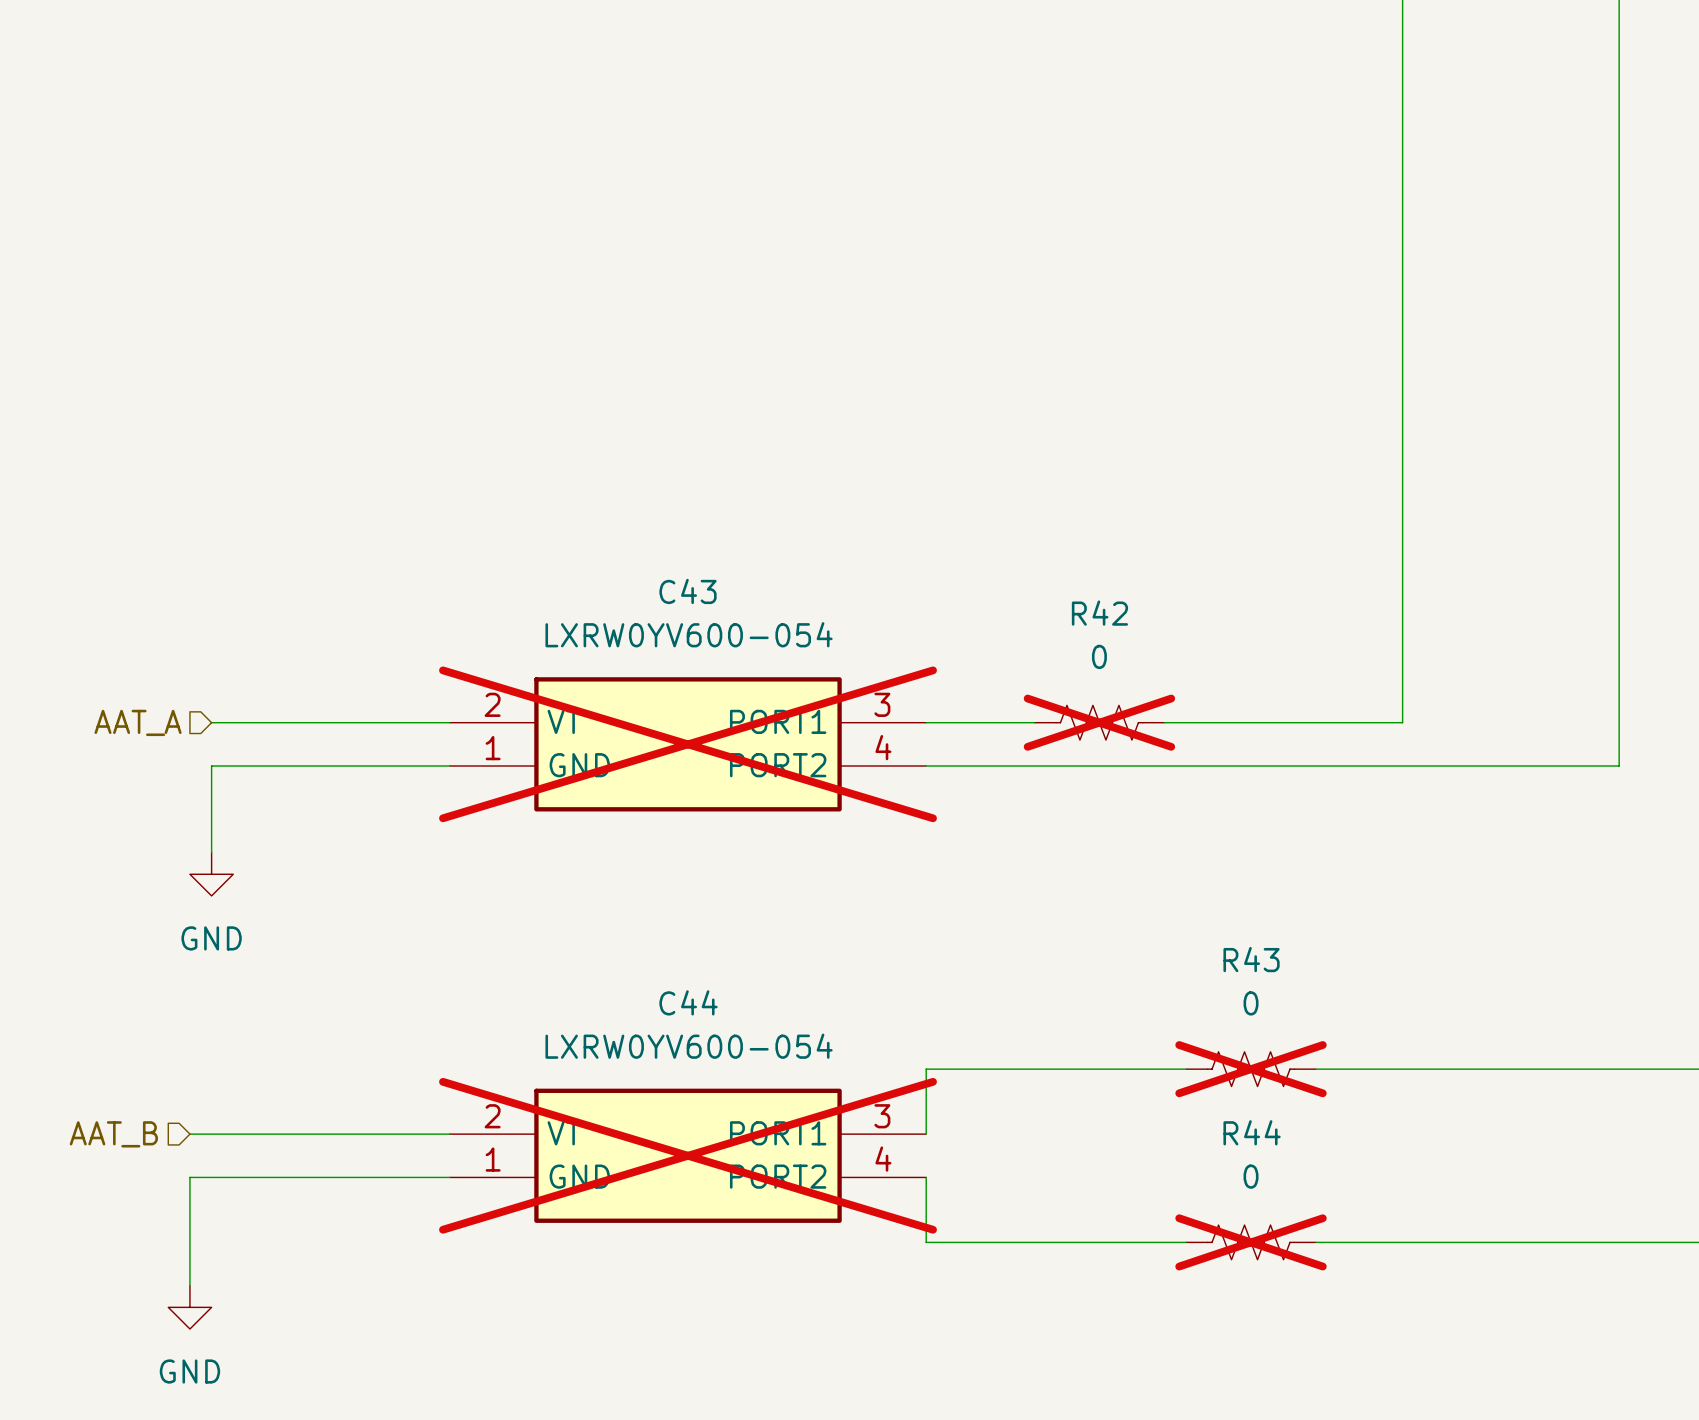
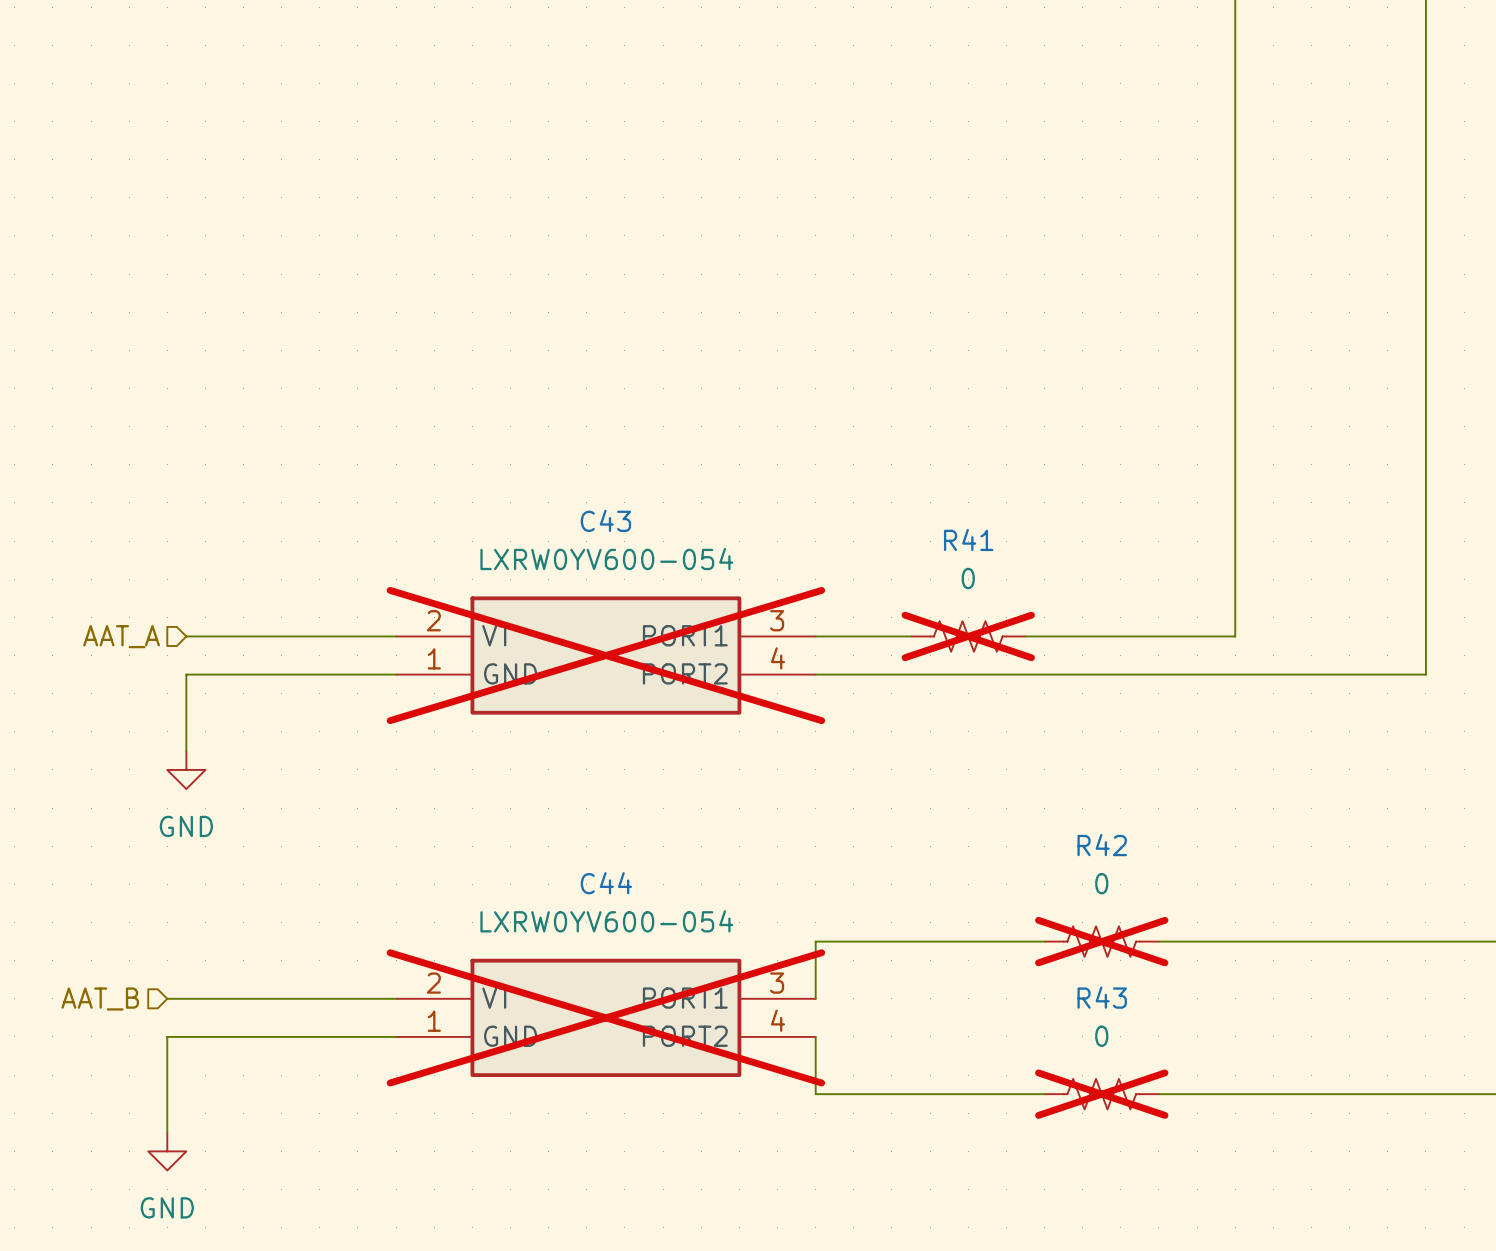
R42 name: R42 (1099, 613) -> R41 (968, 539)
R43 name: R43 (1251, 959) -> R42 (1102, 845)
R44 name: R44 (1252, 1132) -> R43 (1102, 997)

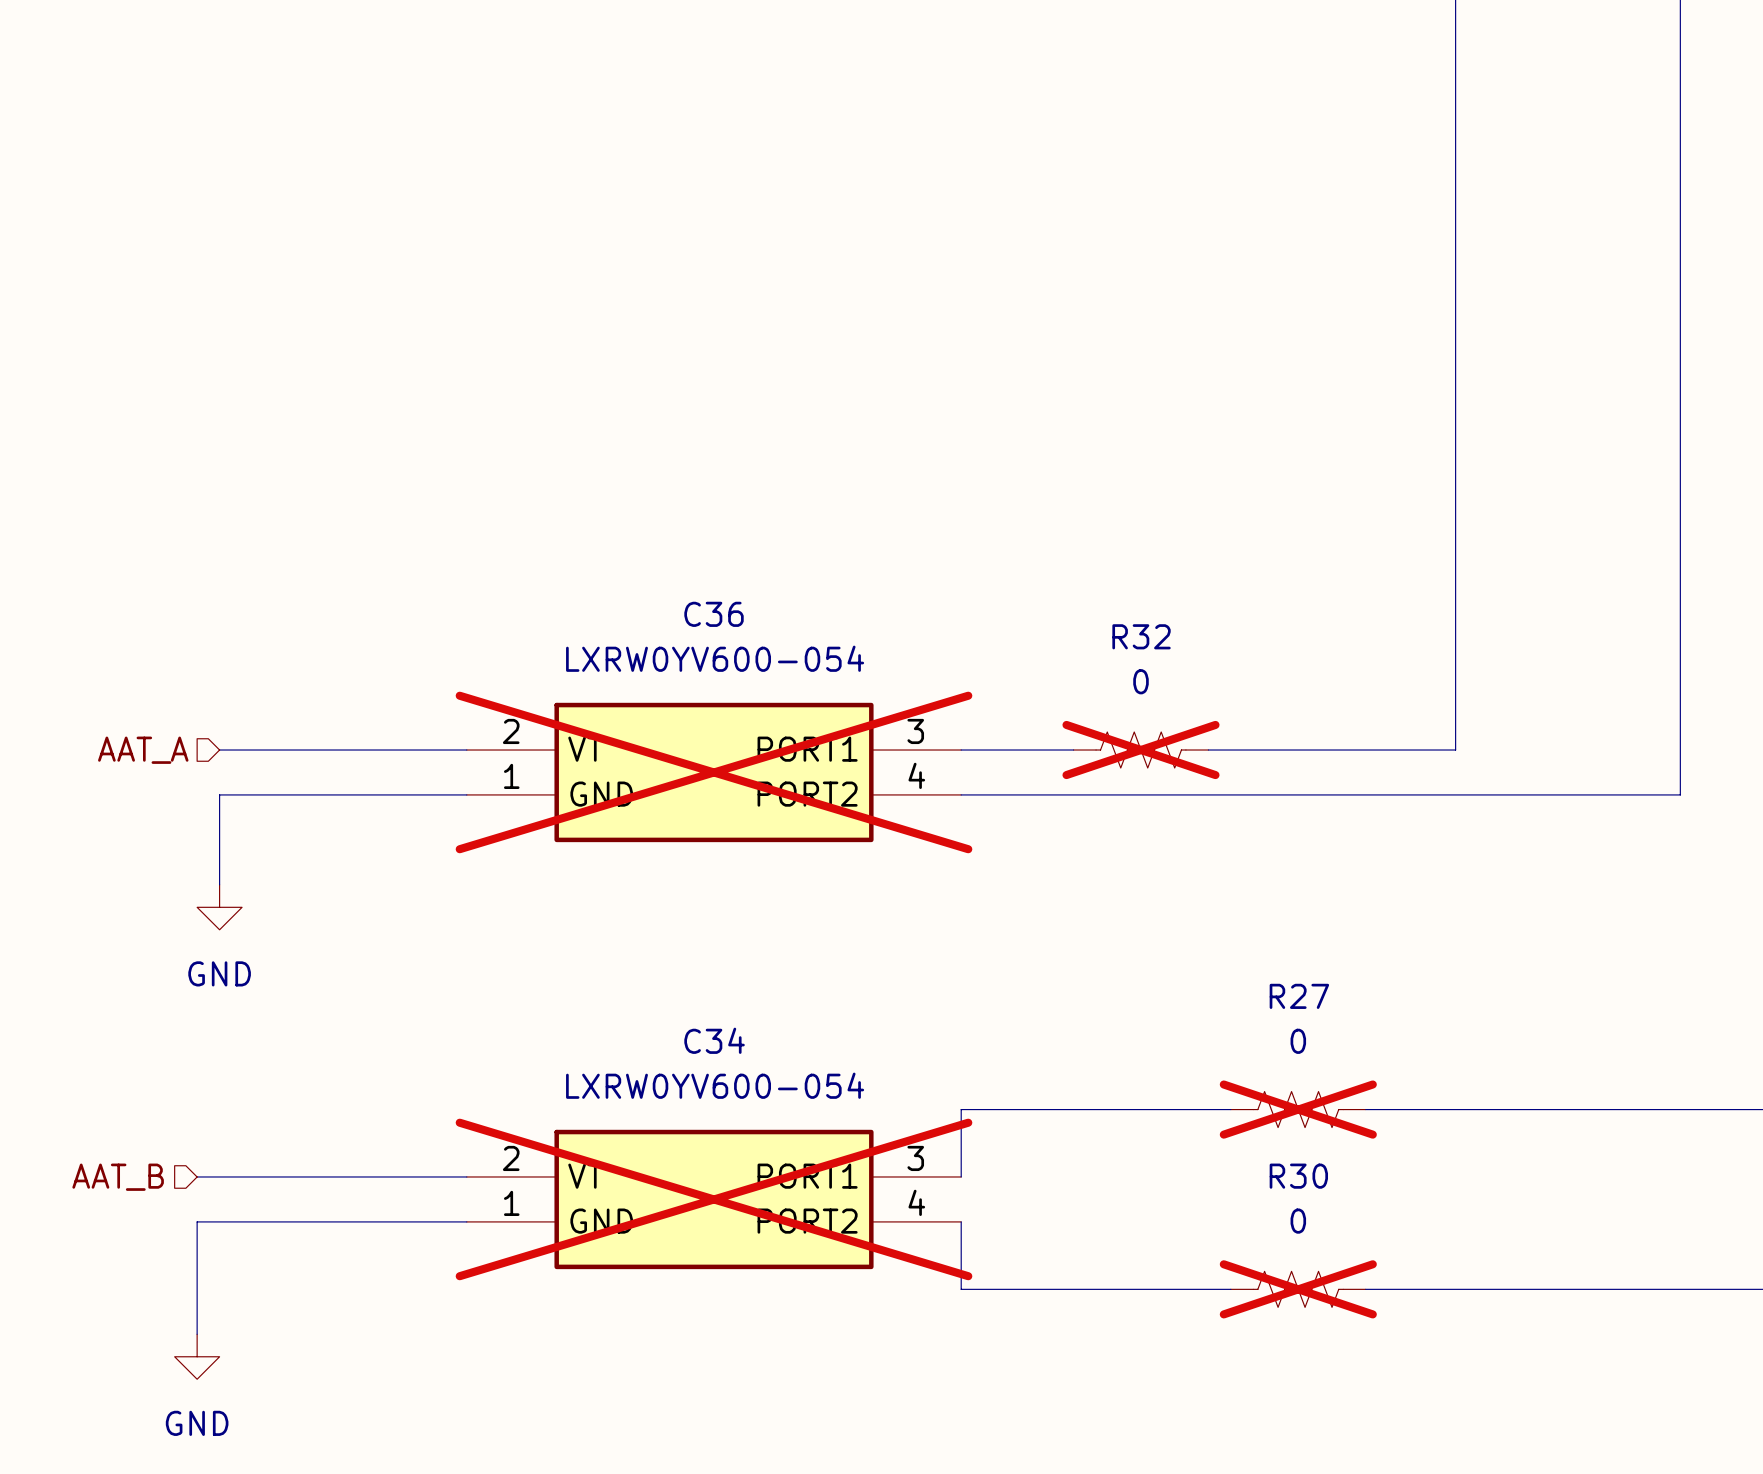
C43 name: C43 (605, 520) -> C36 (714, 614)
R41 name: R41 (968, 539) -> R32 (1141, 636)
R42 name: R42 (1102, 845) -> R27 (1299, 996)
C44 name: C44 (606, 883) -> C34 (714, 1040)
R43 name: R43 (1102, 997) -> R30 (1298, 1176)

